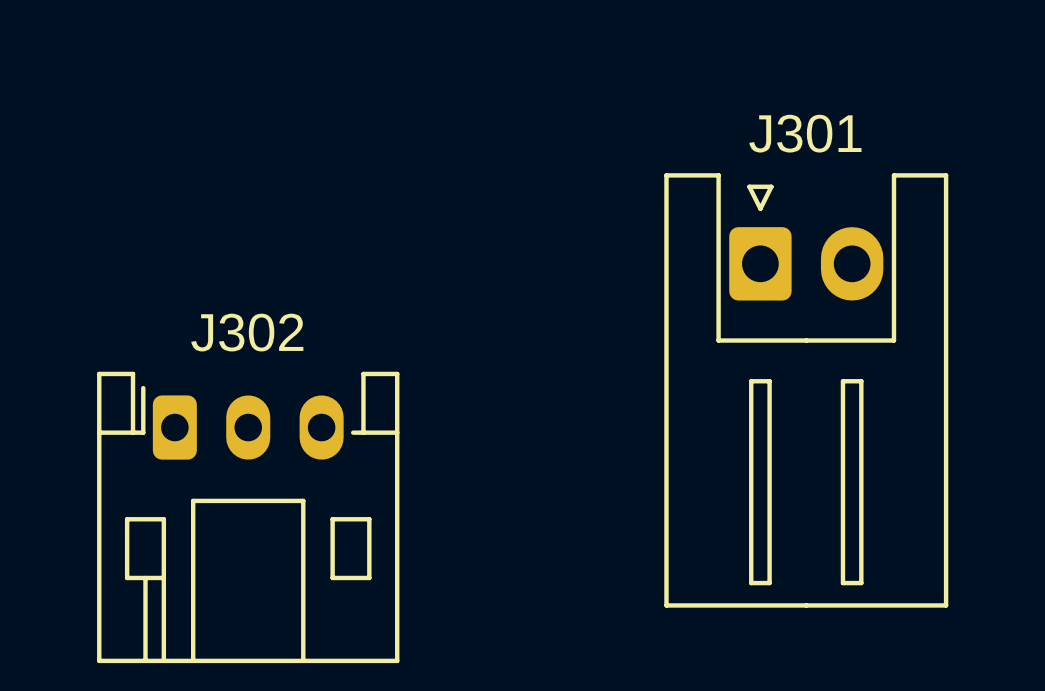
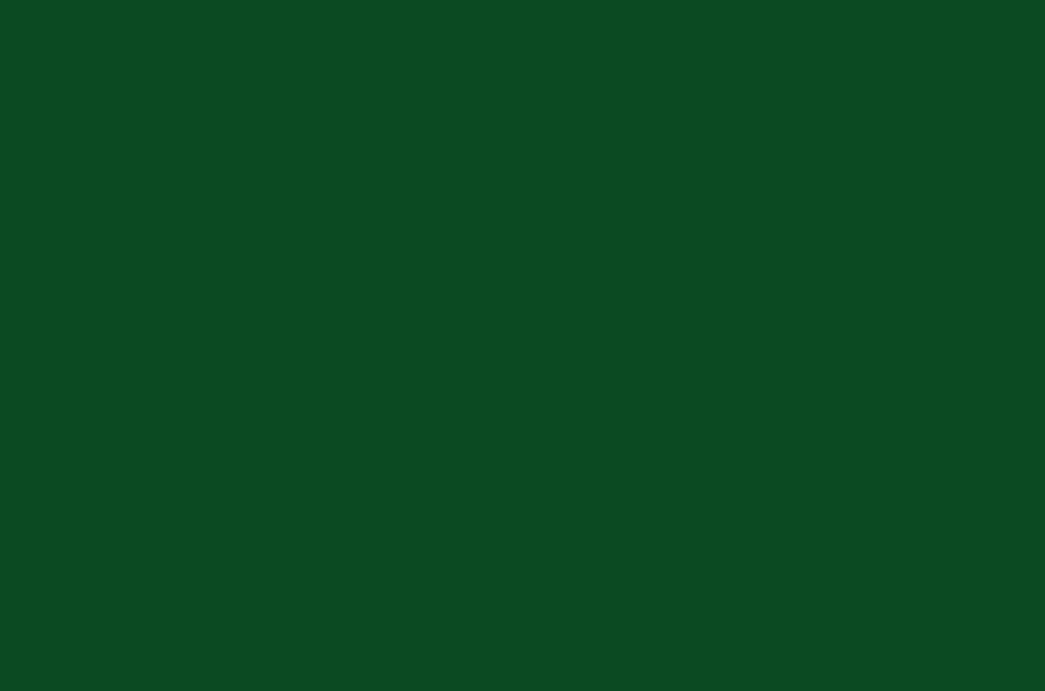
J301: (806, 390) -> none
J302: (248, 517) -> none

